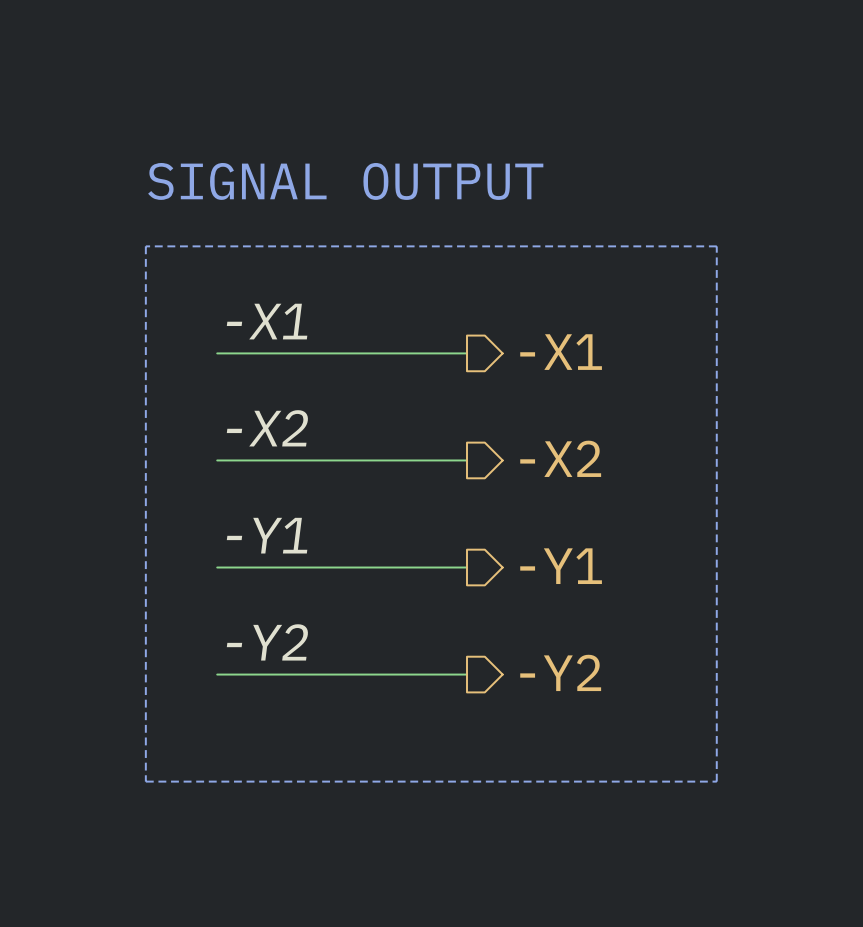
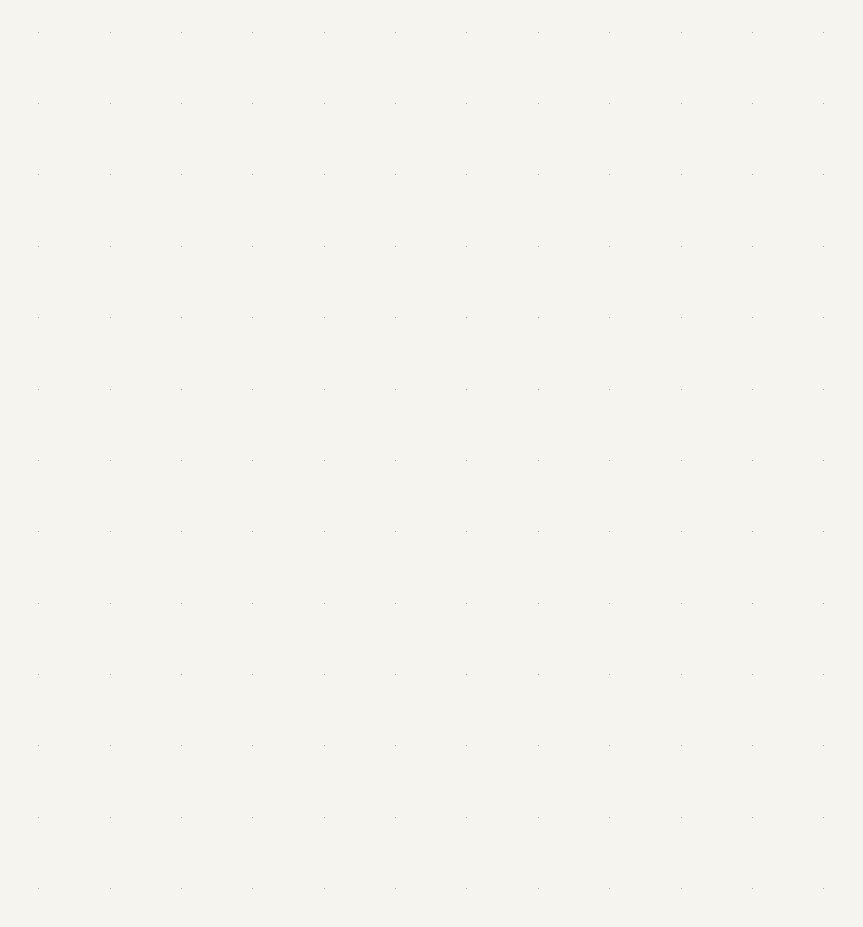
text: SIGNAL OUTPUT (345, 181) -> none
line: (145, 246) (145, 781) (716, 781) (716, 246) (145, 246) -> none
label: -X1 (267, 321) -> none
hierarchical label: -X1 (561, 352) -> none
wire: (217, 353) (466, 353) -> none
label: -X2 (267, 428) -> none
hierarchical label: -X2 (560, 458) -> none
wire: (217, 460) (466, 460) -> none
label: -Y1 (267, 535) -> none
hierarchical label: -Y1 (561, 566) -> none
wire: (217, 567) (466, 567) -> none
label: -Y2 (267, 642) -> none
hierarchical label: -Y2 (560, 672) -> none
wire: (217, 674) (466, 674) -> none

